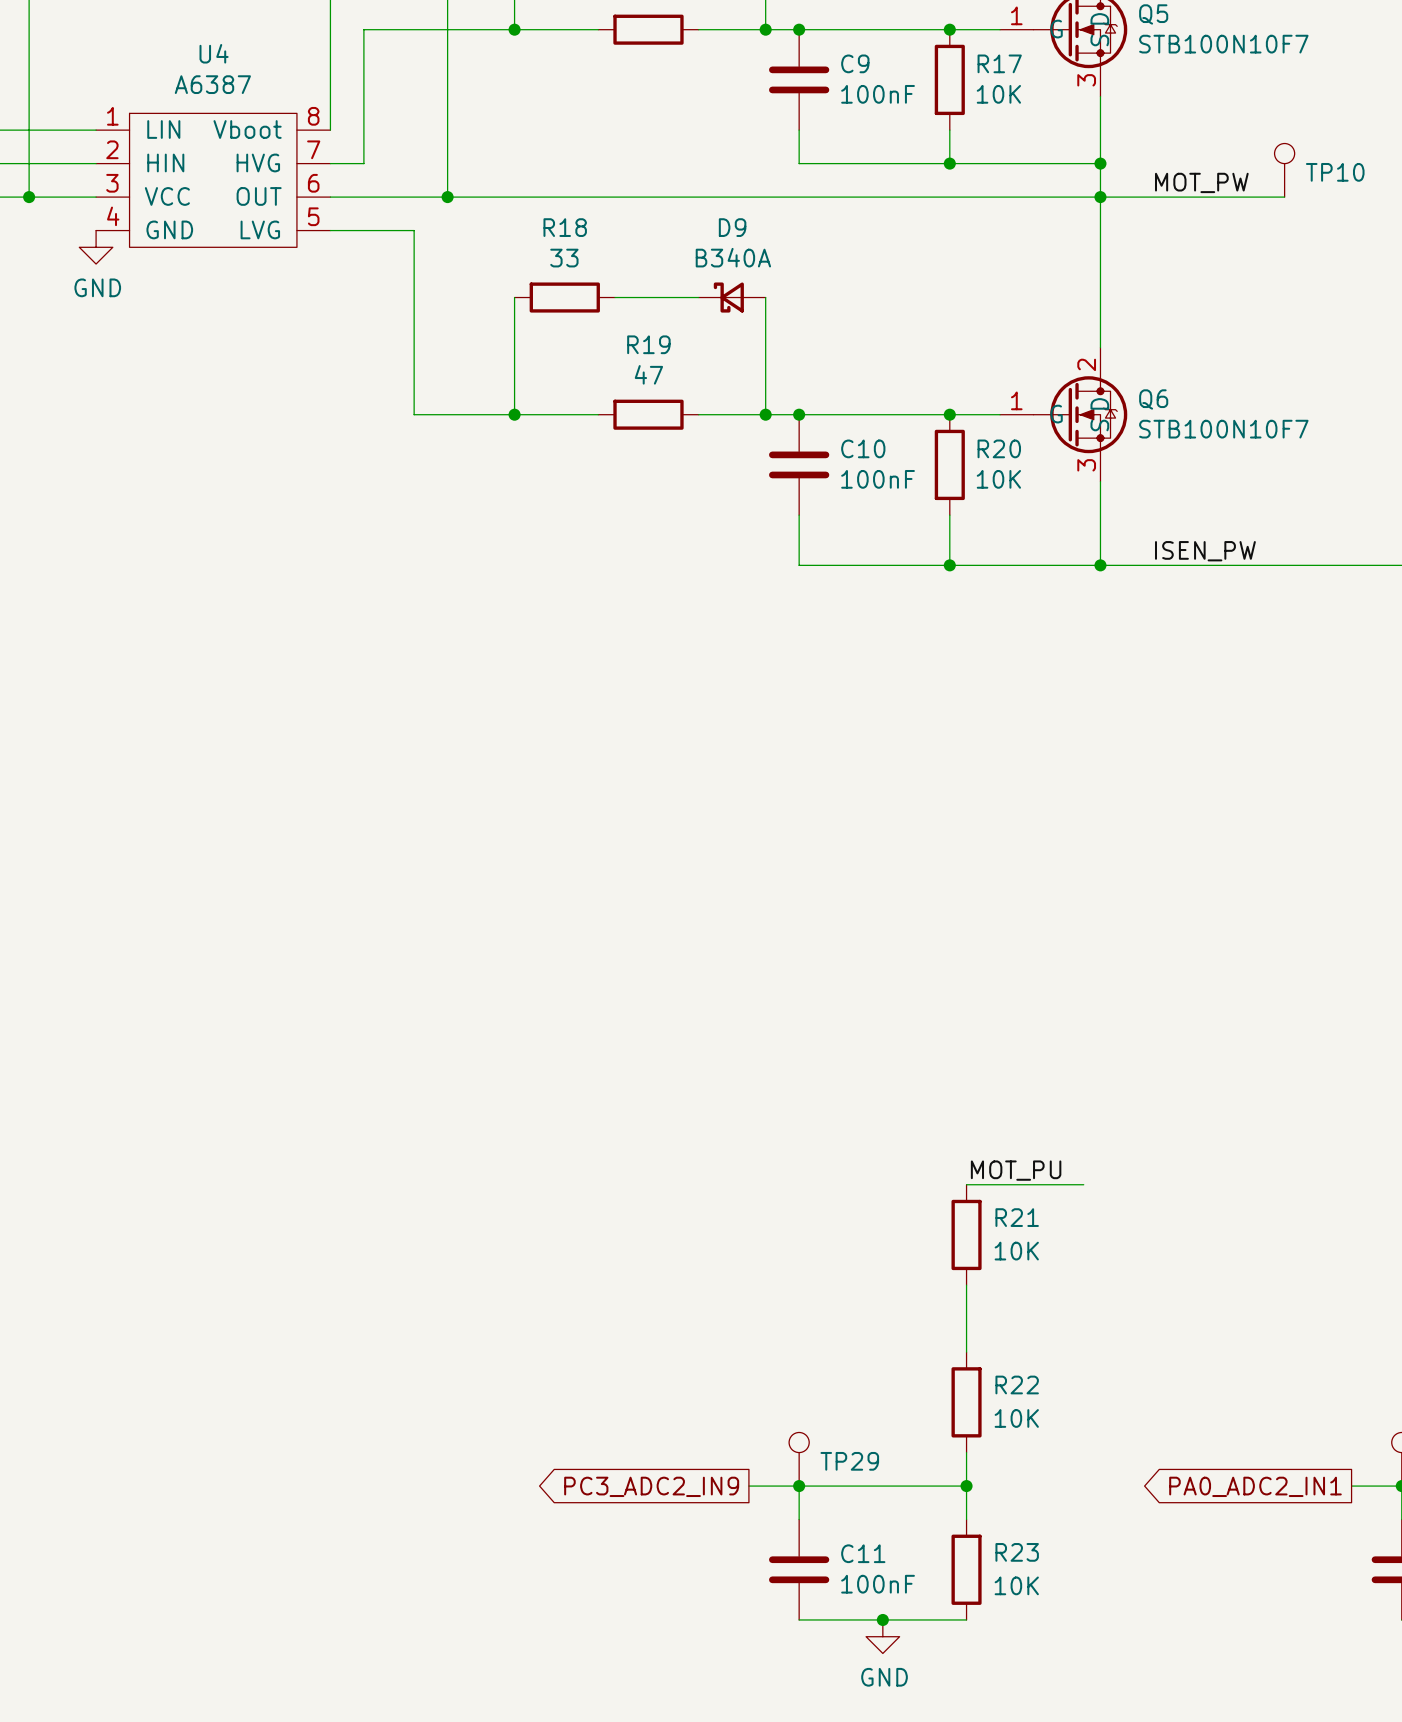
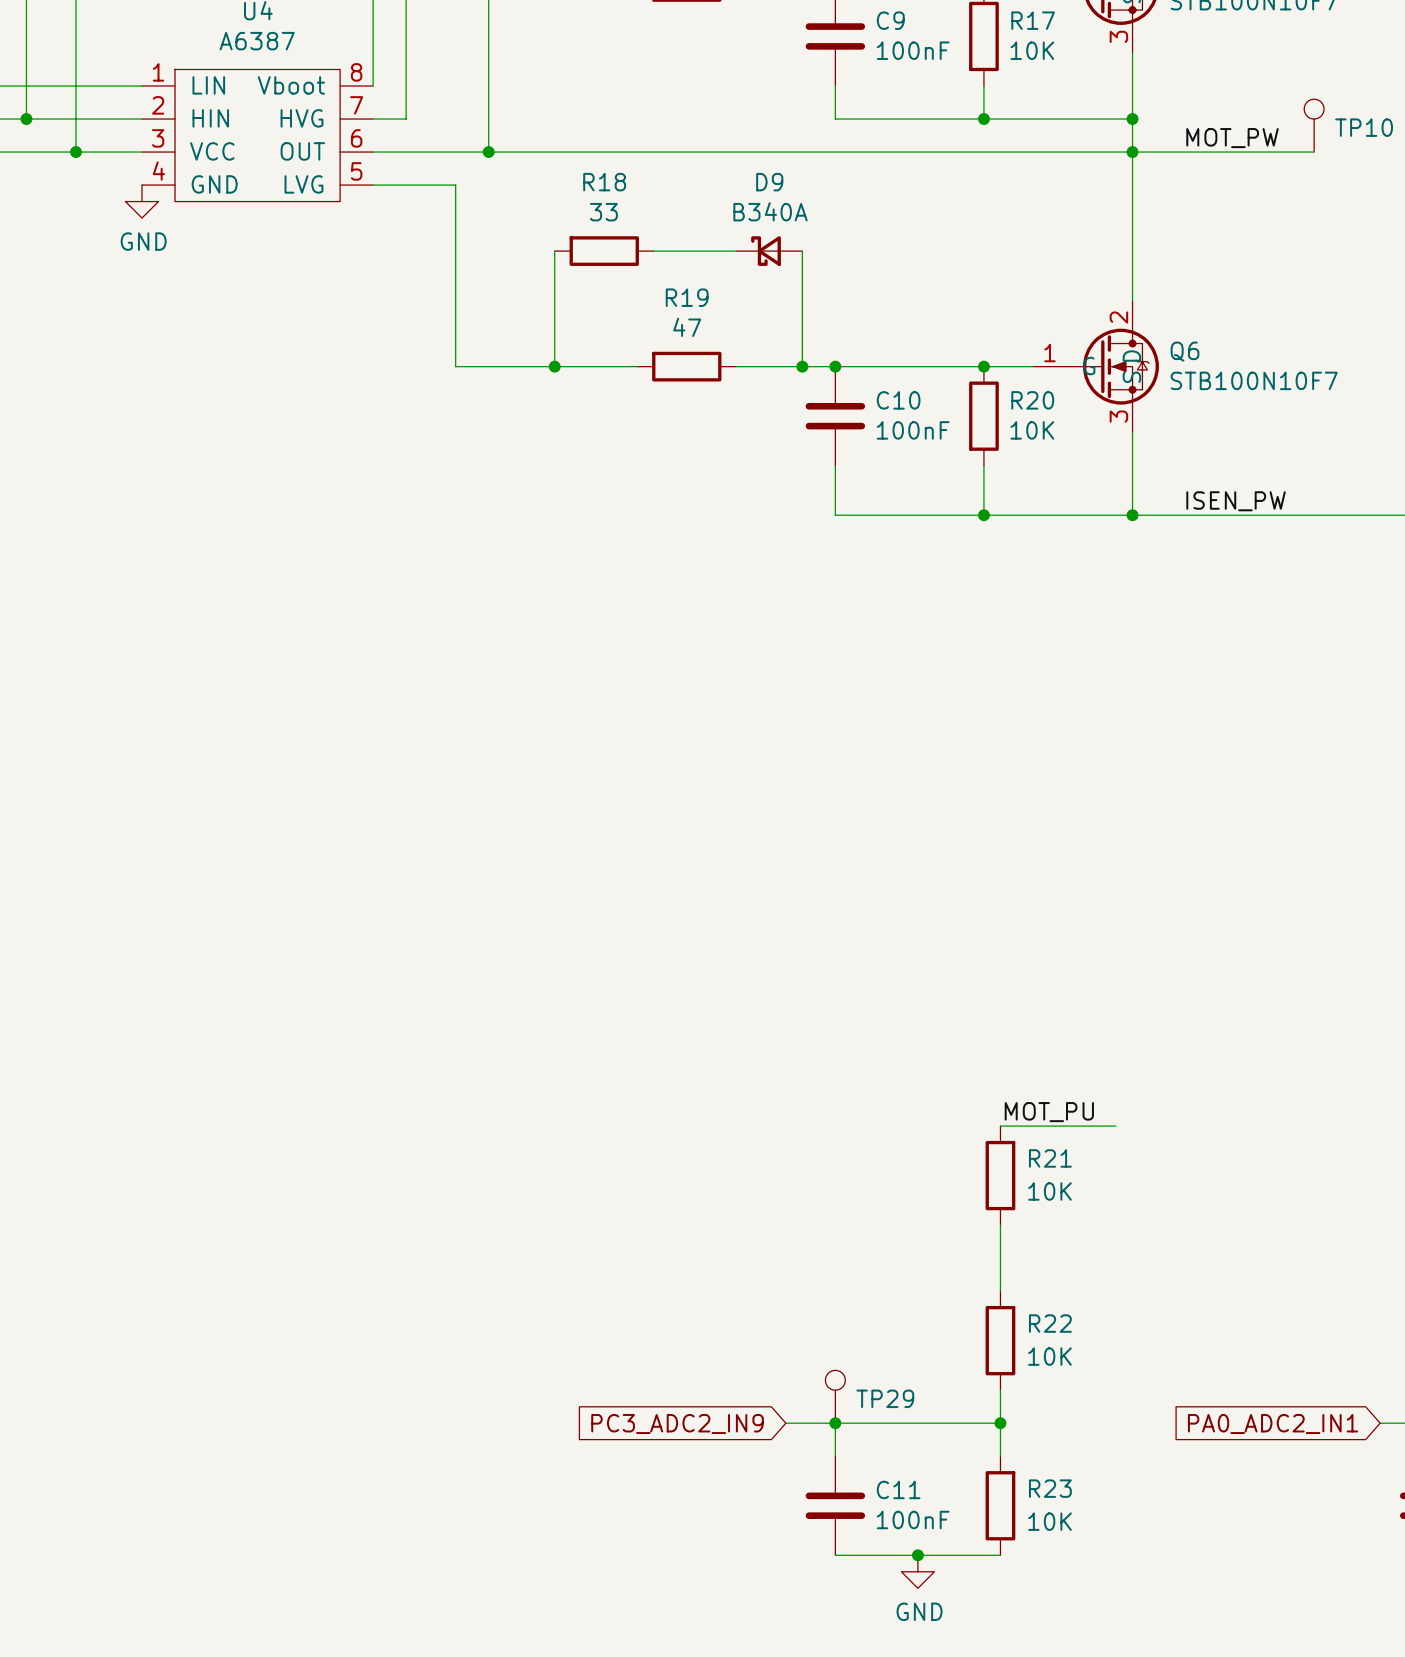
global label shape: output (651, 1486) -> input (677, 1424)
global label shape: output (1255, 1486) -> input (1273, 1424)

